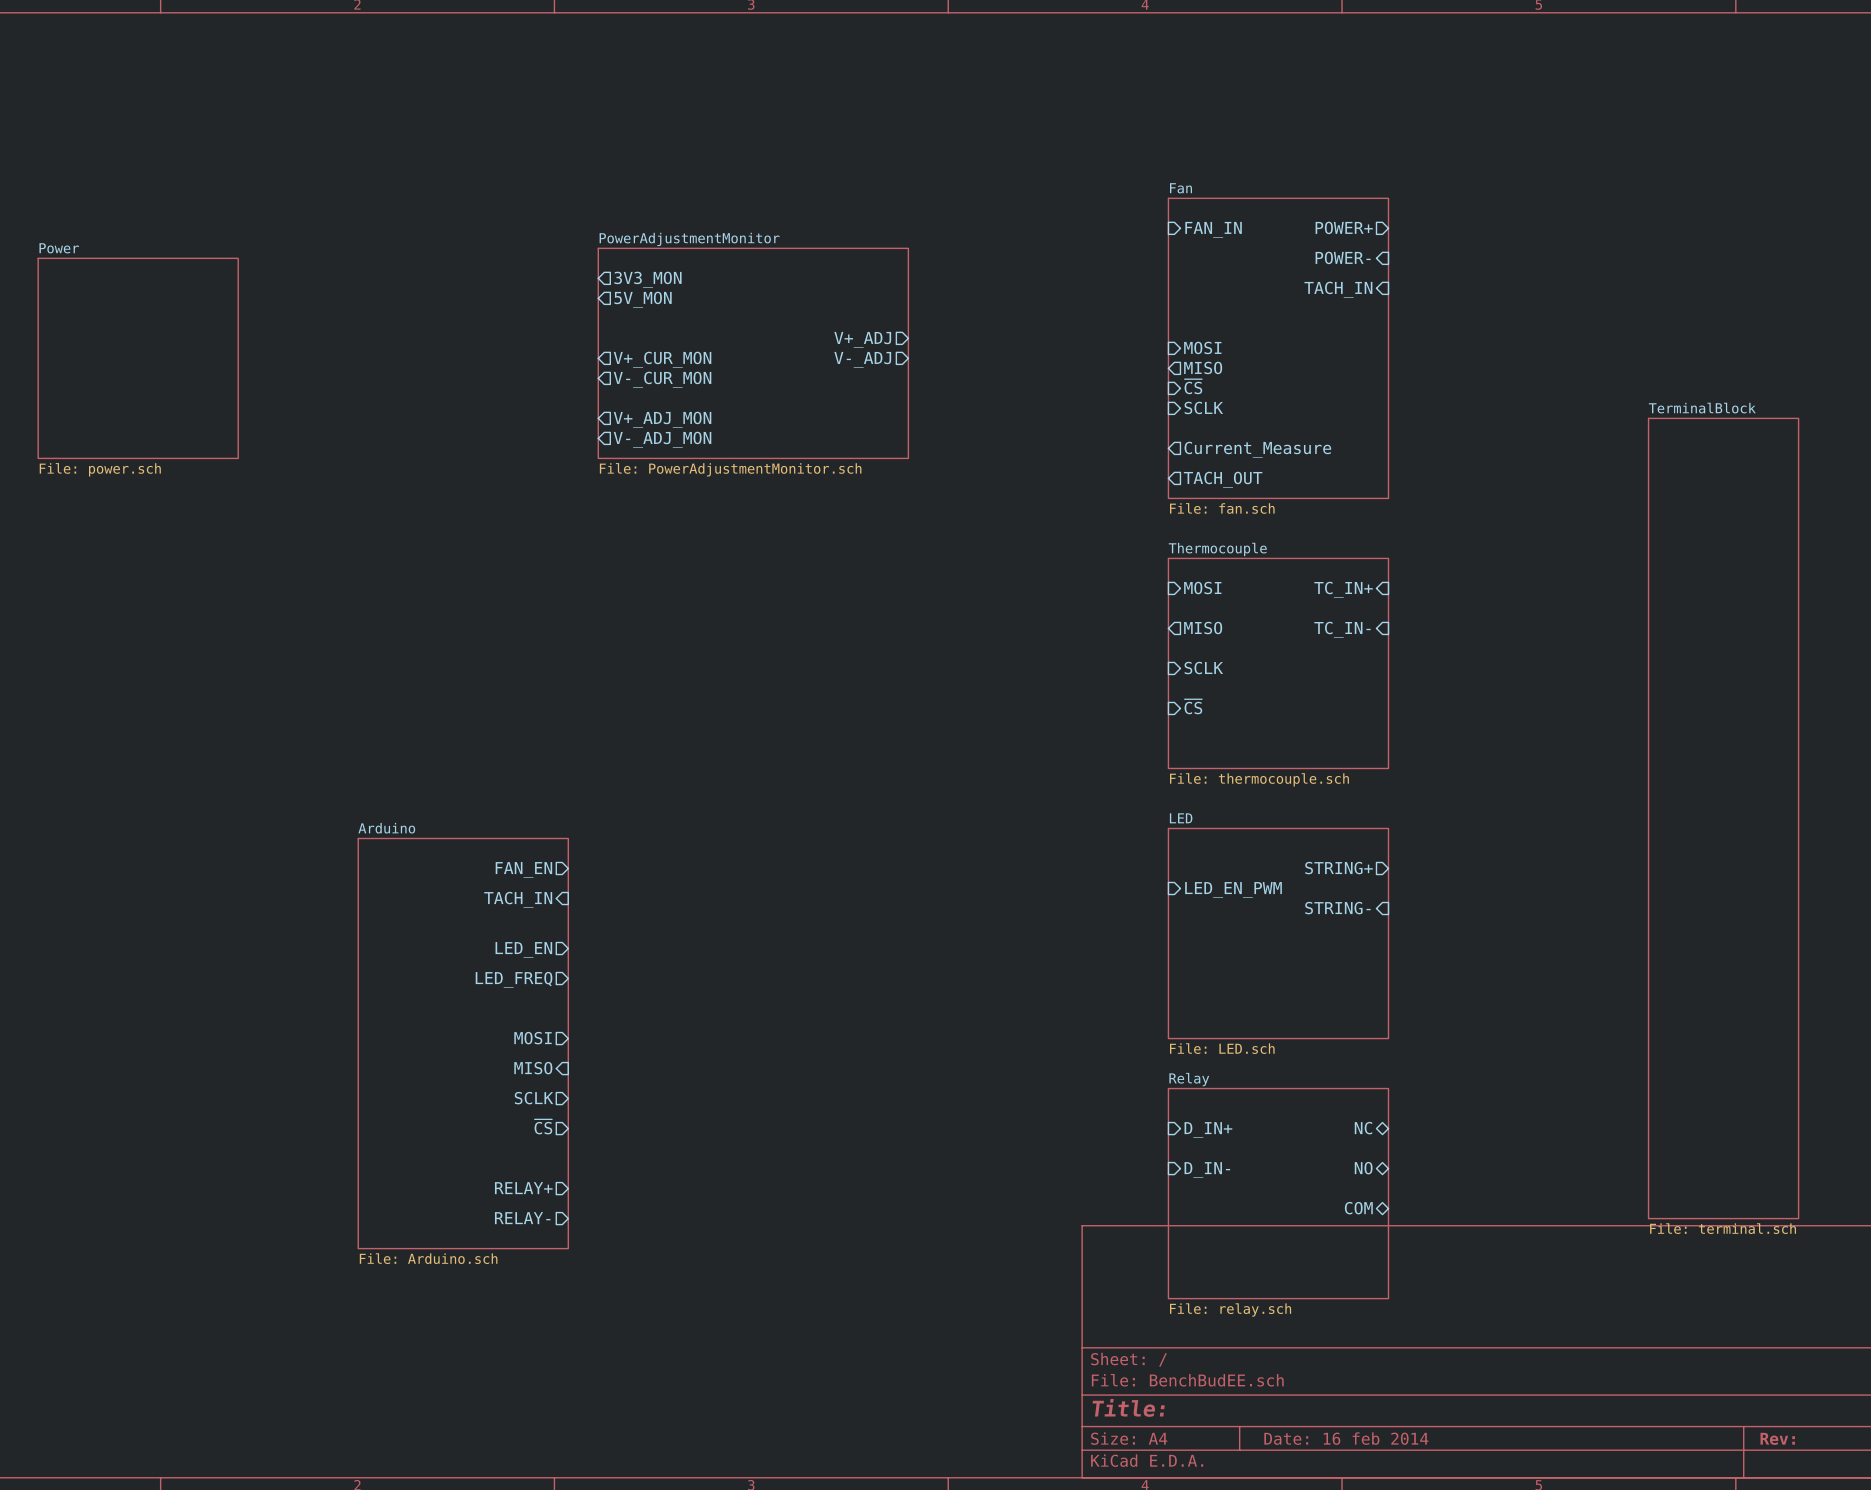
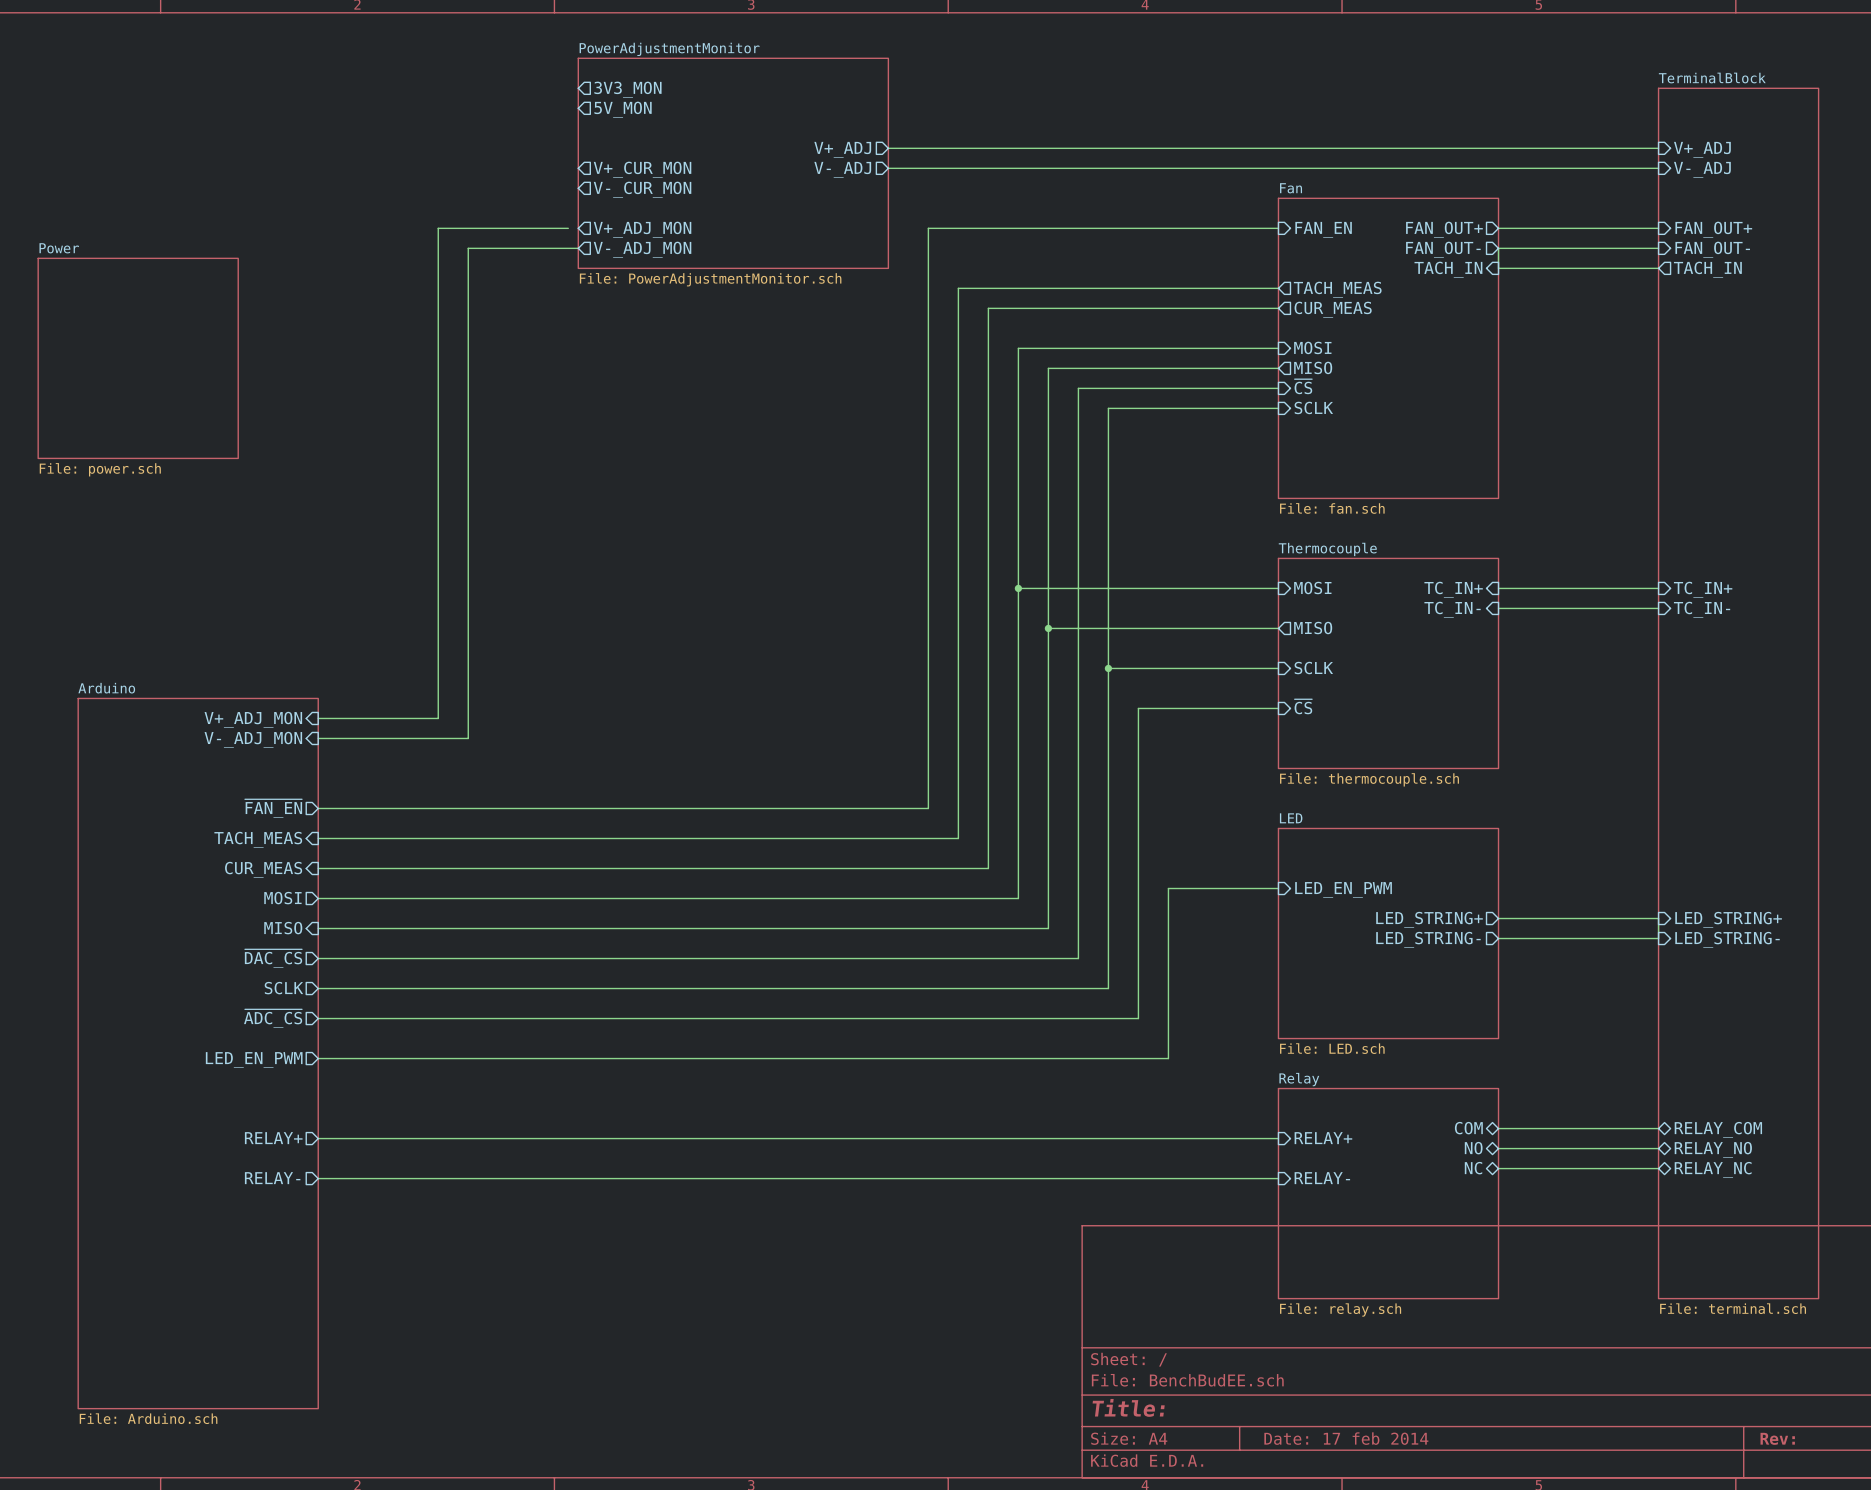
wire: none -> (888, 148) (1658, 148)
sheet pin: none -> V+_ADJ (1702, 149)
wire: none -> (888, 168) (1658, 168)
sheet pin: none -> V-_ADJ (1702, 169)
sheet pin: POWER+ (1344, 227) -> none
wire: none -> (568, 228) (438, 228) (438, 718) (318, 718)
wire: none -> (1278, 228) (928, 228) (928, 808) (318, 808)
wire: none -> (1498, 228) (1658, 228)
sheet pin: FAN_IN (1213, 229) -> none
sheet pin: none -> FAN_EN (1323, 229)
sheet pin: none -> FAN_OUT+ (1444, 229)
sheet pin: none -> FAN_OUT+ (1713, 229)
wire: none -> (578, 248) (468, 248) (468, 738) (318, 738)
wire: none -> (1658, 248) (1498, 248) (1498, 268) (1658, 268)
sheet pin: none -> FAN_OUT- (1443, 249)
sheet pin: none -> FAN_OUT- (1712, 249)
sheet pin: POWER- (1343, 257) -> none
sheet pin: none -> TACH_IN (1707, 269)
sheet pin position: 3V3_MON (647, 279) -> 3V3_MON (627, 89)
wire: none -> (1278, 288) (958, 288) (958, 838) (318, 838)
sheet pin: none -> TACH_MEAS (1337, 289)
sheet pin position: TACH_IN (1338, 289) -> TACH_IN (1448, 269)
sheet pin position: 5V_MON (643, 299) -> 5V_MON (623, 109)
wire: none -> (1278, 308) (988, 308) (988, 868) (318, 868)
sheet pin: none -> CUR_MEAS (1333, 309)
sheet pin position: V+_ADJ (862, 339) -> V+_ADJ (842, 149)
sheet pin position: MOSI (1202, 347) -> MOSI (1312, 347)
wire: none -> (1278, 348) (1018, 348) (1018, 898) (318, 898)
sheet Fan position: (1278, 348) -> (1388, 348)
sheet PowerAdjustmentMonitor position: (753, 353) -> (733, 163)
sheet pin position: V+_CUR_MON (662, 359) -> V+_CUR_MON (642, 169)
sheet pin position: V-_ADJ (862, 359) -> V-_ADJ (842, 169)
sheet pin position: MISO (1203, 367) -> MISO (1313, 367)
wire: none -> (1278, 368) (1048, 368) (1048, 928) (318, 928)
sheet pin position: V-_CUR_MON (662, 379) -> V-_CUR_MON (642, 189)
sheet pin position: ~{CS} (1193, 386) -> ~{CS} (1303, 386)
wire: none -> (1278, 388) (1078, 388) (1078, 958) (318, 958)
sheet pin position: SCLK (1203, 407) -> SCLK (1313, 407)
wire: none -> (1278, 408) (1108, 408) (1108, 988) (318, 988)
sheet pin position: V+_ADJ_MON (662, 419) -> V+_ADJ_MON (642, 229)
sheet pin position: V-_ADJ_MON (662, 439) -> V-_ADJ_MON (642, 249)
sheet pin: Current_Measure (1257, 449) -> none
sheet pin: TACH_OUT (1223, 479) -> none
wire: none -> (1018, 588) (1278, 588)
junction: none -> (1018, 588)
sheet pin position: MOSI (1202, 588) -> MOSI (1312, 588)
wire: none -> (1498, 588) (1658, 588)
sheet pin position: TC_IN+ (1343, 589) -> TC_IN+ (1453, 589)
sheet pin: none -> TC_IN+ (1703, 589)
wire: none -> (1498, 608) (1658, 608)
sheet pin: none -> TC_IN- (1702, 609)
wire: none -> (1048, 628) (1278, 628)
junction: none -> (1048, 628)
sheet pin position: MISO (1203, 628) -> MISO (1313, 628)
sheet pin position: TC_IN- (1342, 629) -> TC_IN- (1452, 609)
sheet Thermocouple position: (1278, 663) -> (1388, 663)
wire: none -> (1108, 668) (1278, 668)
junction: none -> (1108, 668)
sheet pin position: SCLK (1203, 668) -> SCLK (1313, 668)
sheet TerminalBlock: none -> File: terminal.sch (1738, 693)
sheet pin position: ~{CS} (1193, 706) -> ~{CS} (1303, 706)
wire: none -> (1278, 708) (1138, 708) (1138, 1018) (318, 1018)
sheet pin: none -> V+_ADJ_MON (253, 719)
sheet pin: none -> V-_ADJ_MON (253, 739)
sheet pin: none -> ~{FAN_EN} (273, 808)
sheet TerminalBlock: File: terminal.sch (1723, 818) -> none
sheet pin: none -> TACH_MEAS (258, 839)
sheet pin: STRING+ (1339, 868) -> none
sheet pin: none -> CUR_MEAS (263, 869)
sheet pin: FAN_EN (523, 869) -> none
wire: none -> (1278, 888) (1168, 888) (1168, 1058) (318, 1058)
sheet pin position: LED_EN_PWM (1233, 890) -> LED_EN_PWM (1343, 890)
sheet pin: none -> MOSI (282, 898)
sheet pin: TACH_IN (518, 899) -> none
sheet pin shape: input (1337, 908) -> output (1429, 919)
sheet pin: STRING- (1337, 908) -> LED_STRING+ (1429, 919)
wire: none -> (1498, 918) (1658, 918) (1658, 938) (1498, 938)
sheet pin: none -> LED_STRING+ (1728, 919)
sheet pin: none -> MISO (283, 928)
sheet LED position: (1278, 933) -> (1388, 933)
sheet pin: none -> LED_STRING- (1428, 939)
sheet pin: none -> LED_STRING- (1727, 939)
sheet pin: LED_EN (523, 950) -> none
sheet pin: none -> ~{DAC_CS} (273, 958)
sheet pin: LED_FREQ (514, 979) -> none
sheet pin: none -> SCLK (283, 988)
sheet pin: none -> ~{ADC_CS} (273, 1018)
sheet pin: MOSI (533, 1038) -> none
sheet Arduino: File: Arduino.sch (463, 1043) -> none
sheet Arduino: none -> File: Arduino.sch (198, 1053)
sheet pin: none -> LED_EN_PWM (254, 1060)
sheet pin: MISO (533, 1068) -> none
sheet pin: SCLK (533, 1098) -> none
sheet pin: ~{CS} (543, 1126) -> none
sheet pin position: NC (1363, 1128) -> NC (1473, 1168)
wire: none -> (1498, 1128) (1658, 1128)
sheet pin: none -> RELAY_COM (1718, 1129)
sheet pin: D_IN+ (1208, 1130) -> none
sheet pin: none -> RELAY+ (273, 1138)
wire: none -> (318, 1138) (1278, 1138)
sheet pin: none -> RELAY+ (1323, 1138)
wire: none -> (1498, 1148) (1658, 1148)
sheet pin: none -> RELAY_NO (1713, 1149)
sheet pin position: NO (1363, 1168) -> NO (1473, 1148)
wire: none -> (1498, 1168) (1658, 1168)
sheet pin: none -> RELAY_NC (1713, 1169)
sheet pin: D_IN- (1207, 1170) -> none
sheet pin: none -> RELAY- (272, 1178)
wire: none -> (318, 1178) (1278, 1178)
sheet pin: none -> RELAY- (1322, 1178)
sheet pin: RELAY+ (523, 1188) -> none
sheet Relay position: (1278, 1193) -> (1388, 1193)
sheet pin position: COM (1358, 1208) -> COM (1468, 1128)
sheet pin: RELAY- (522, 1218) -> none
title block: Date: 16 feb 2014 (1346, 1438) -> Date: 17 feb 2014 (1346, 1438)

